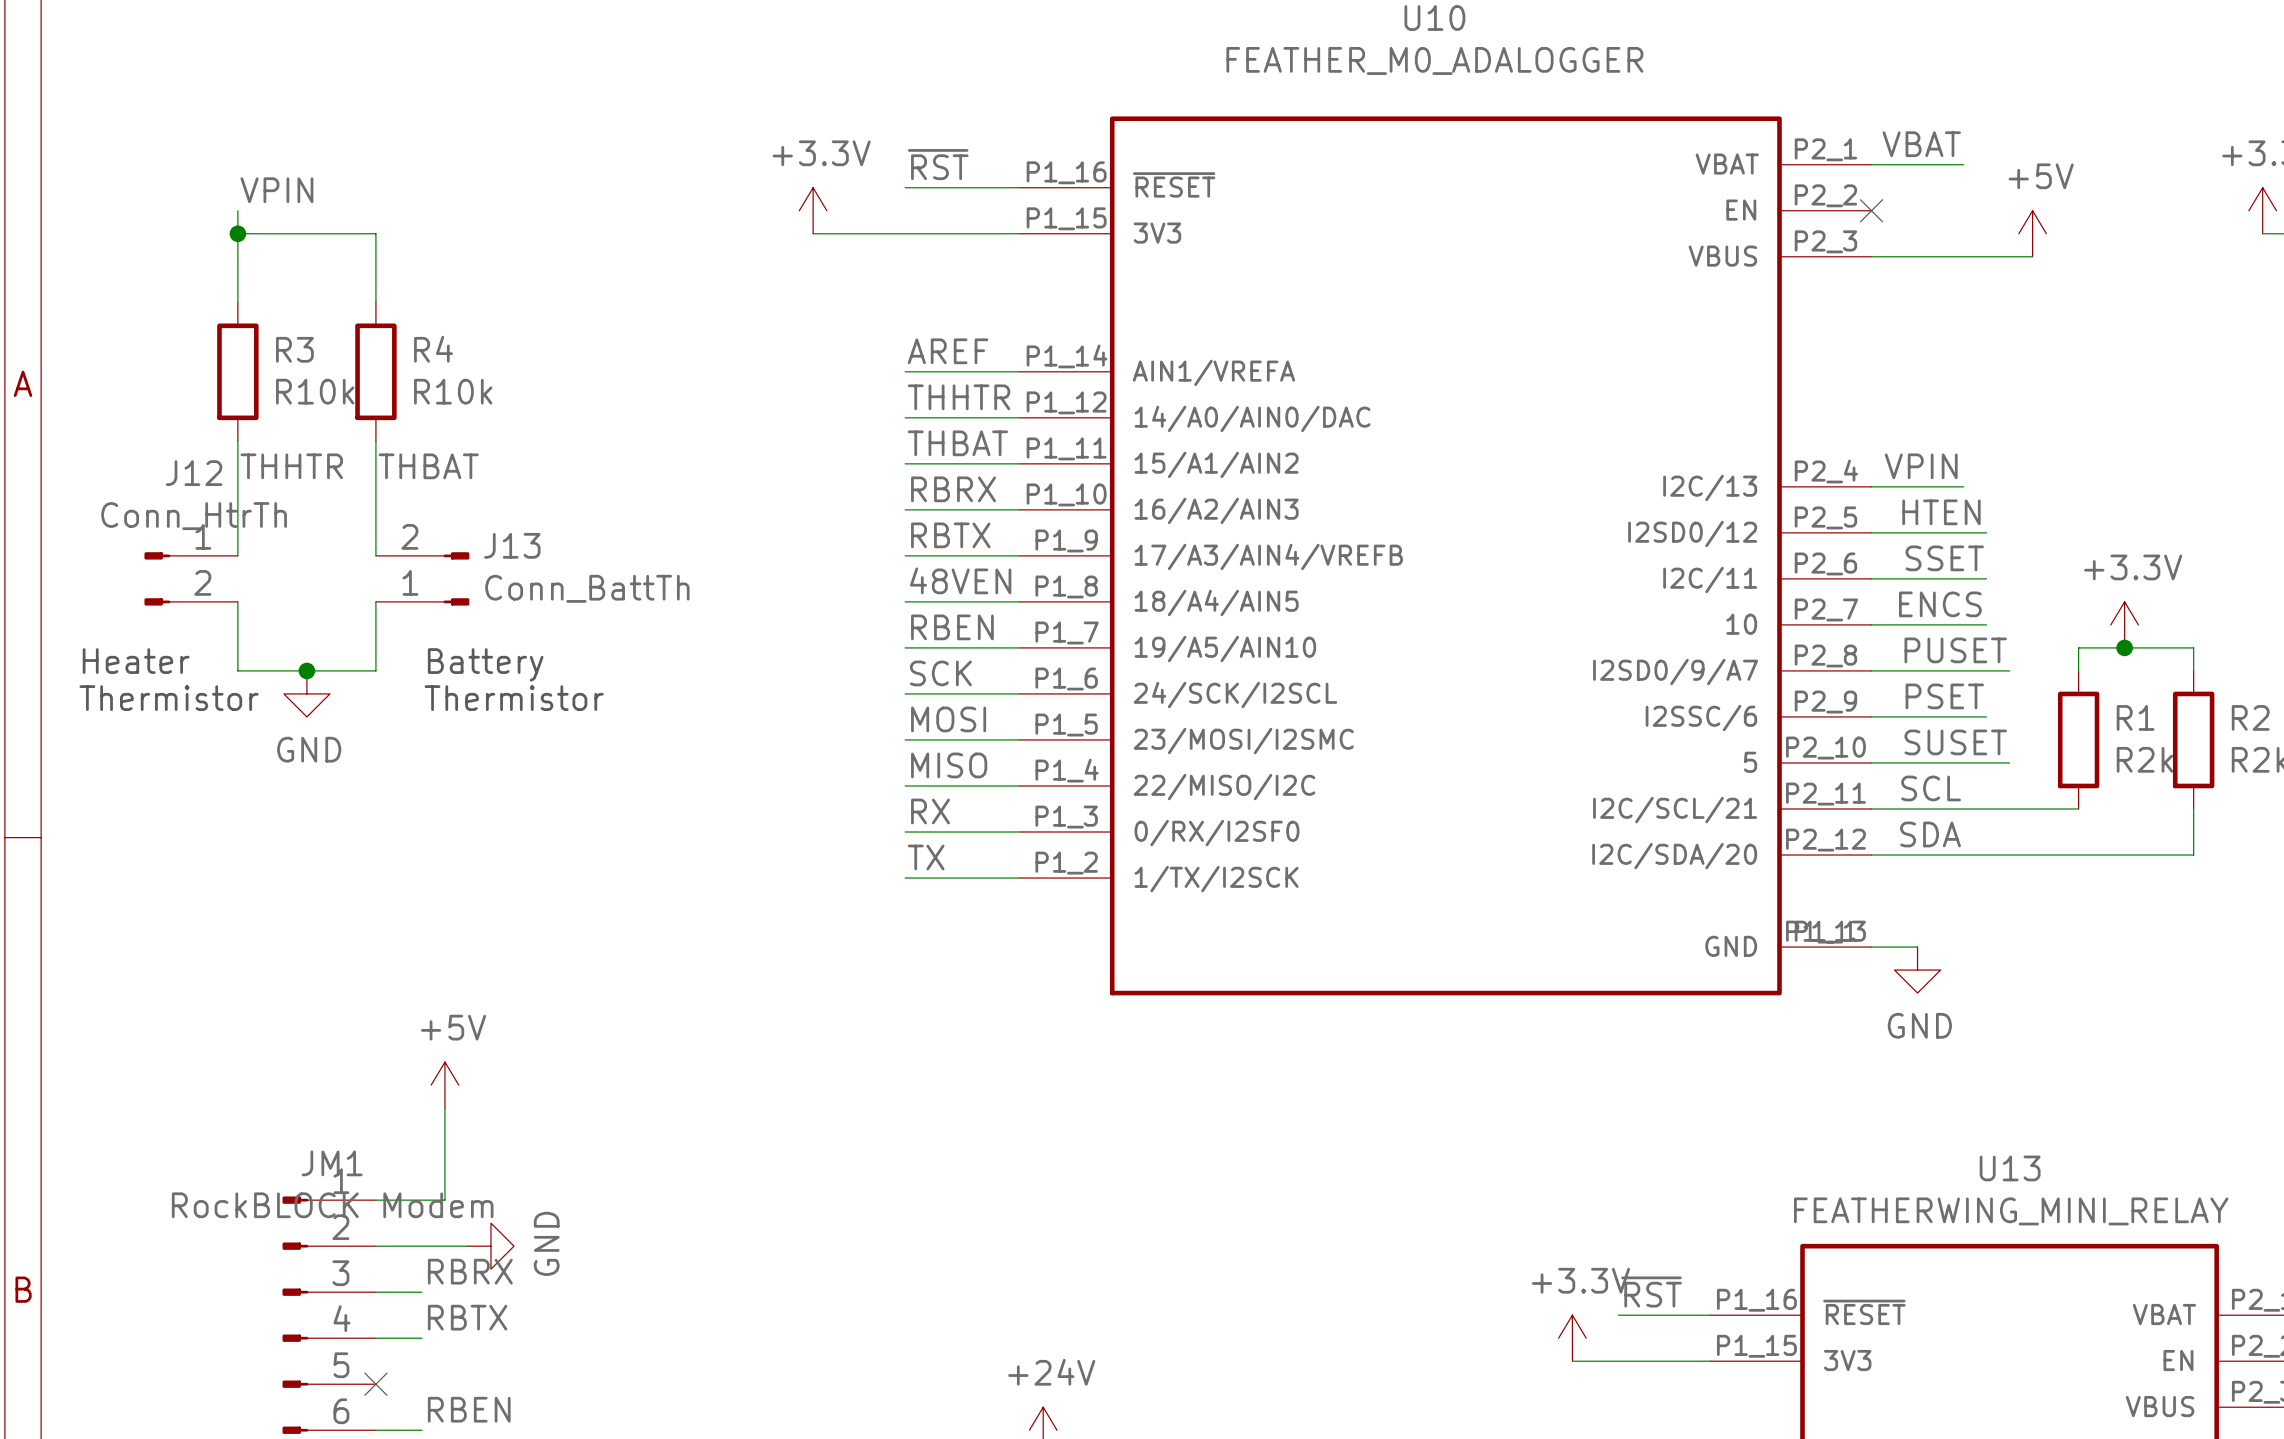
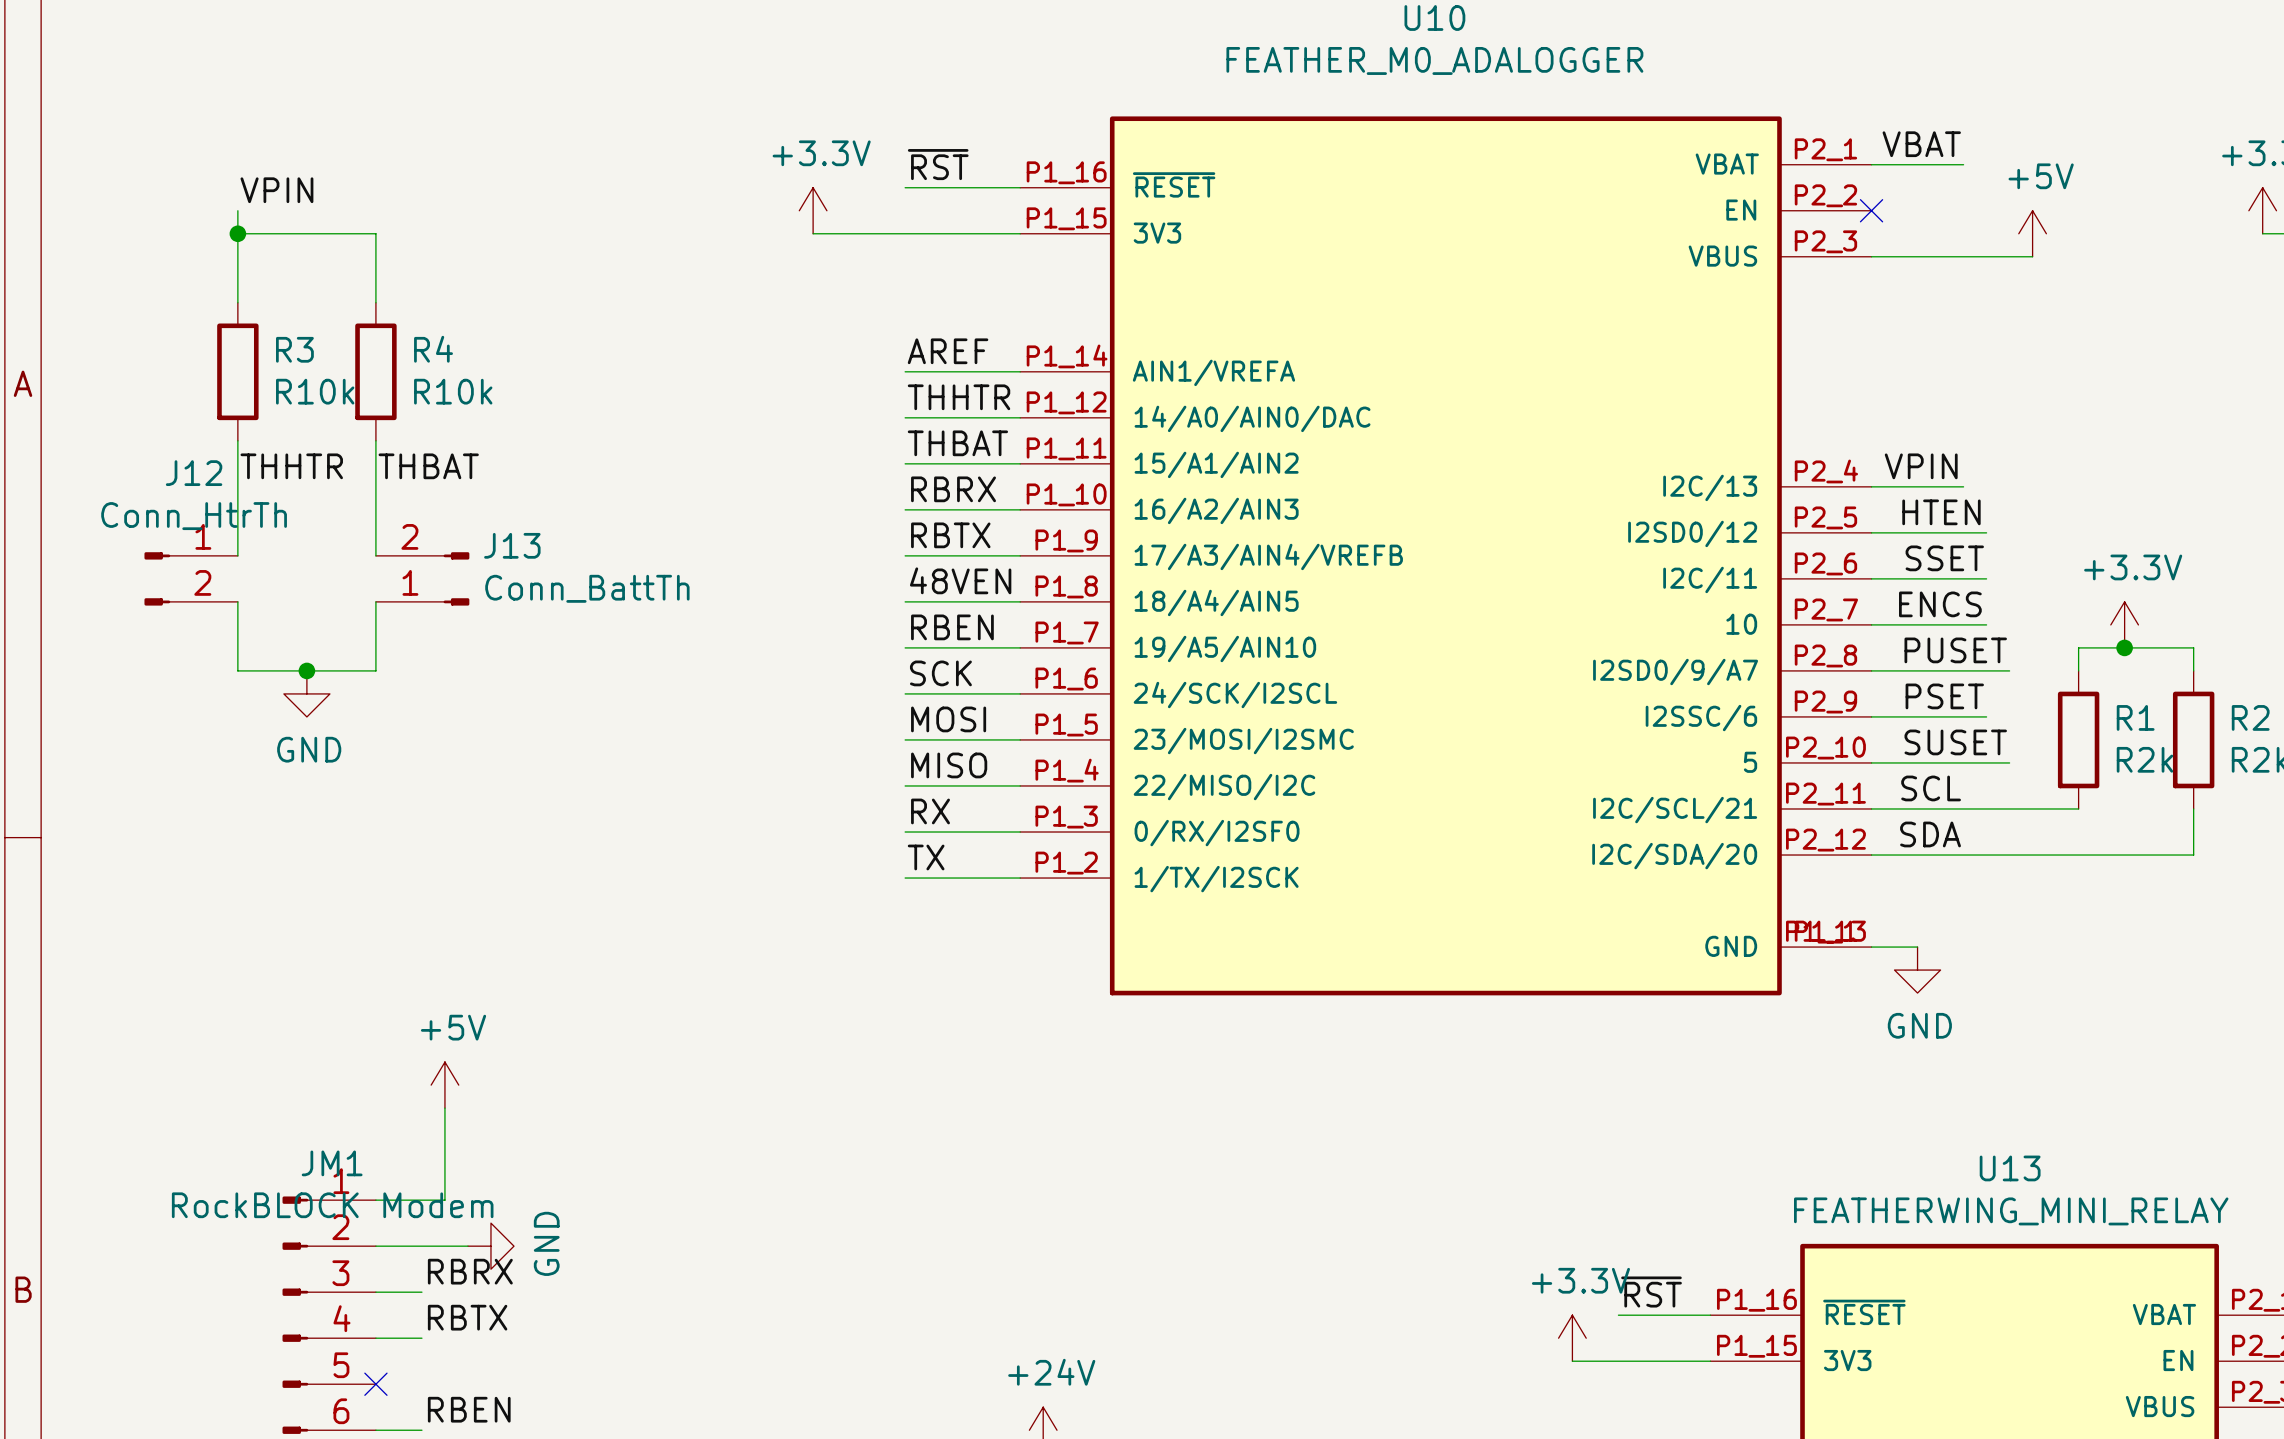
text: Heater (136, 661) -> none
text: Battery (485, 664) -> none
text: Thermistor (169, 698) -> none
text: Thermistor (514, 698) -> none

